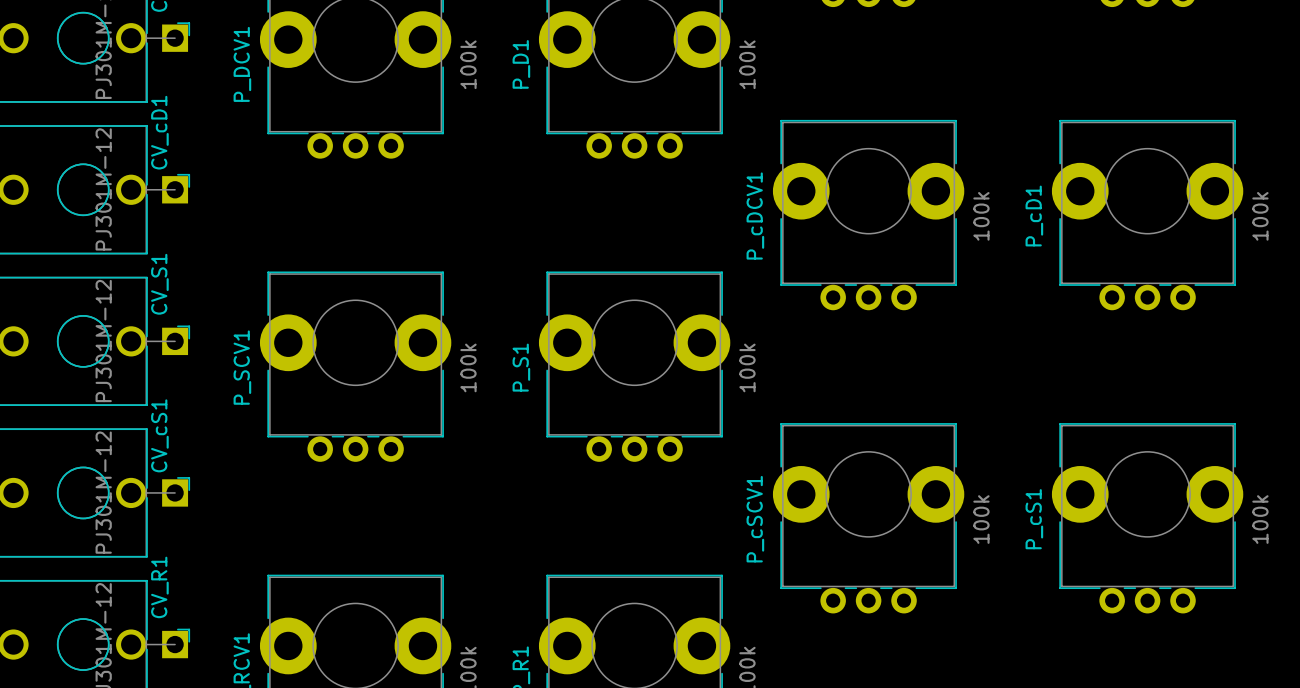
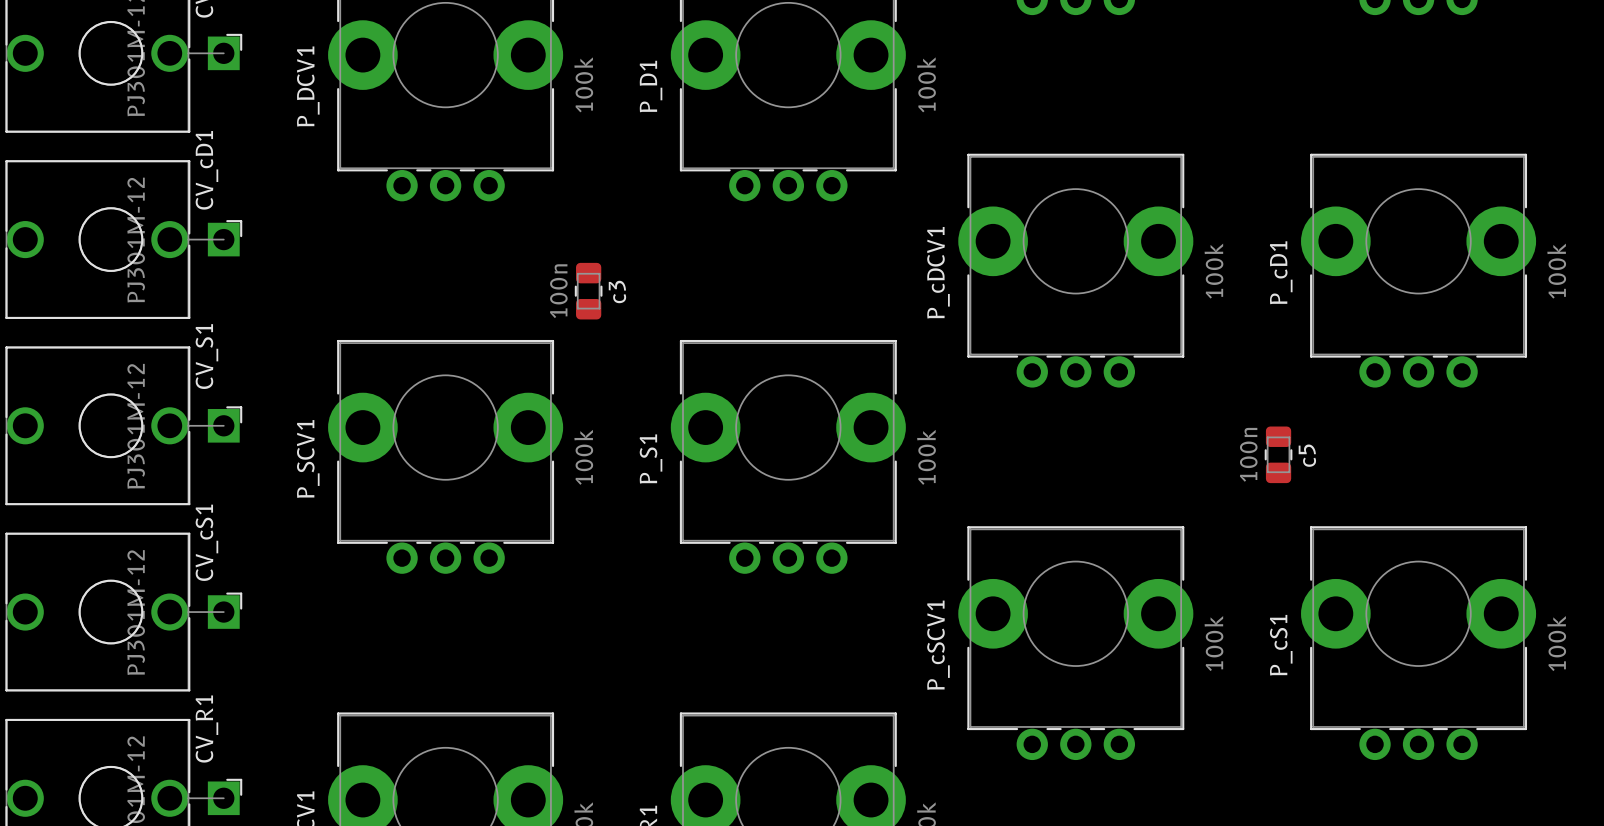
c3: none -> 100n (588, 291)
c5: none -> 100n (1278, 454)

